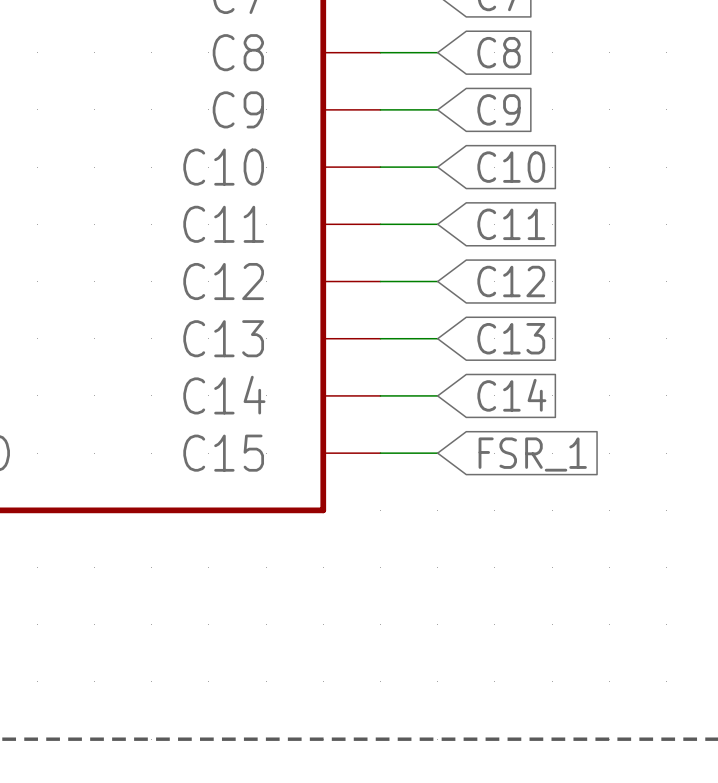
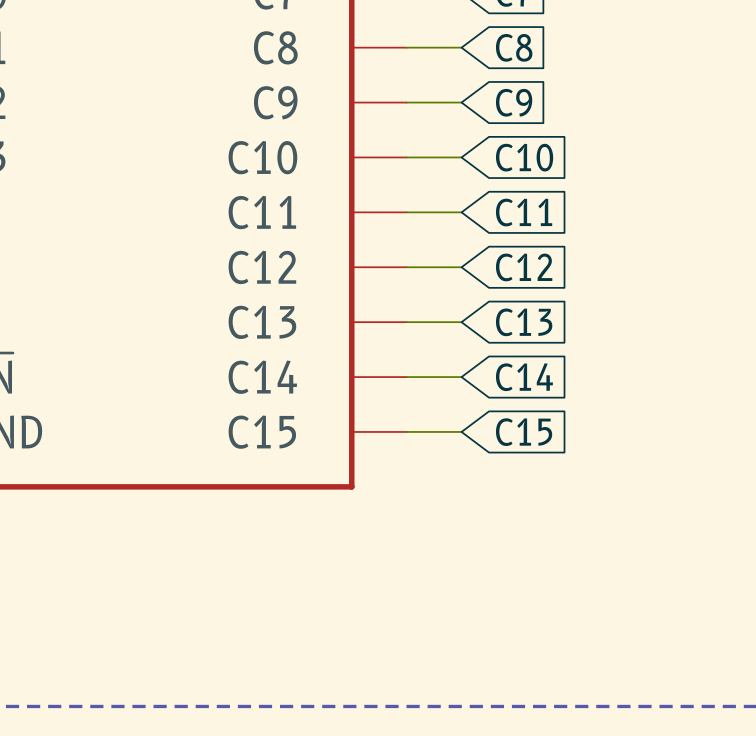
global label: FSR_1 (532, 454) -> C15 (524, 432)

